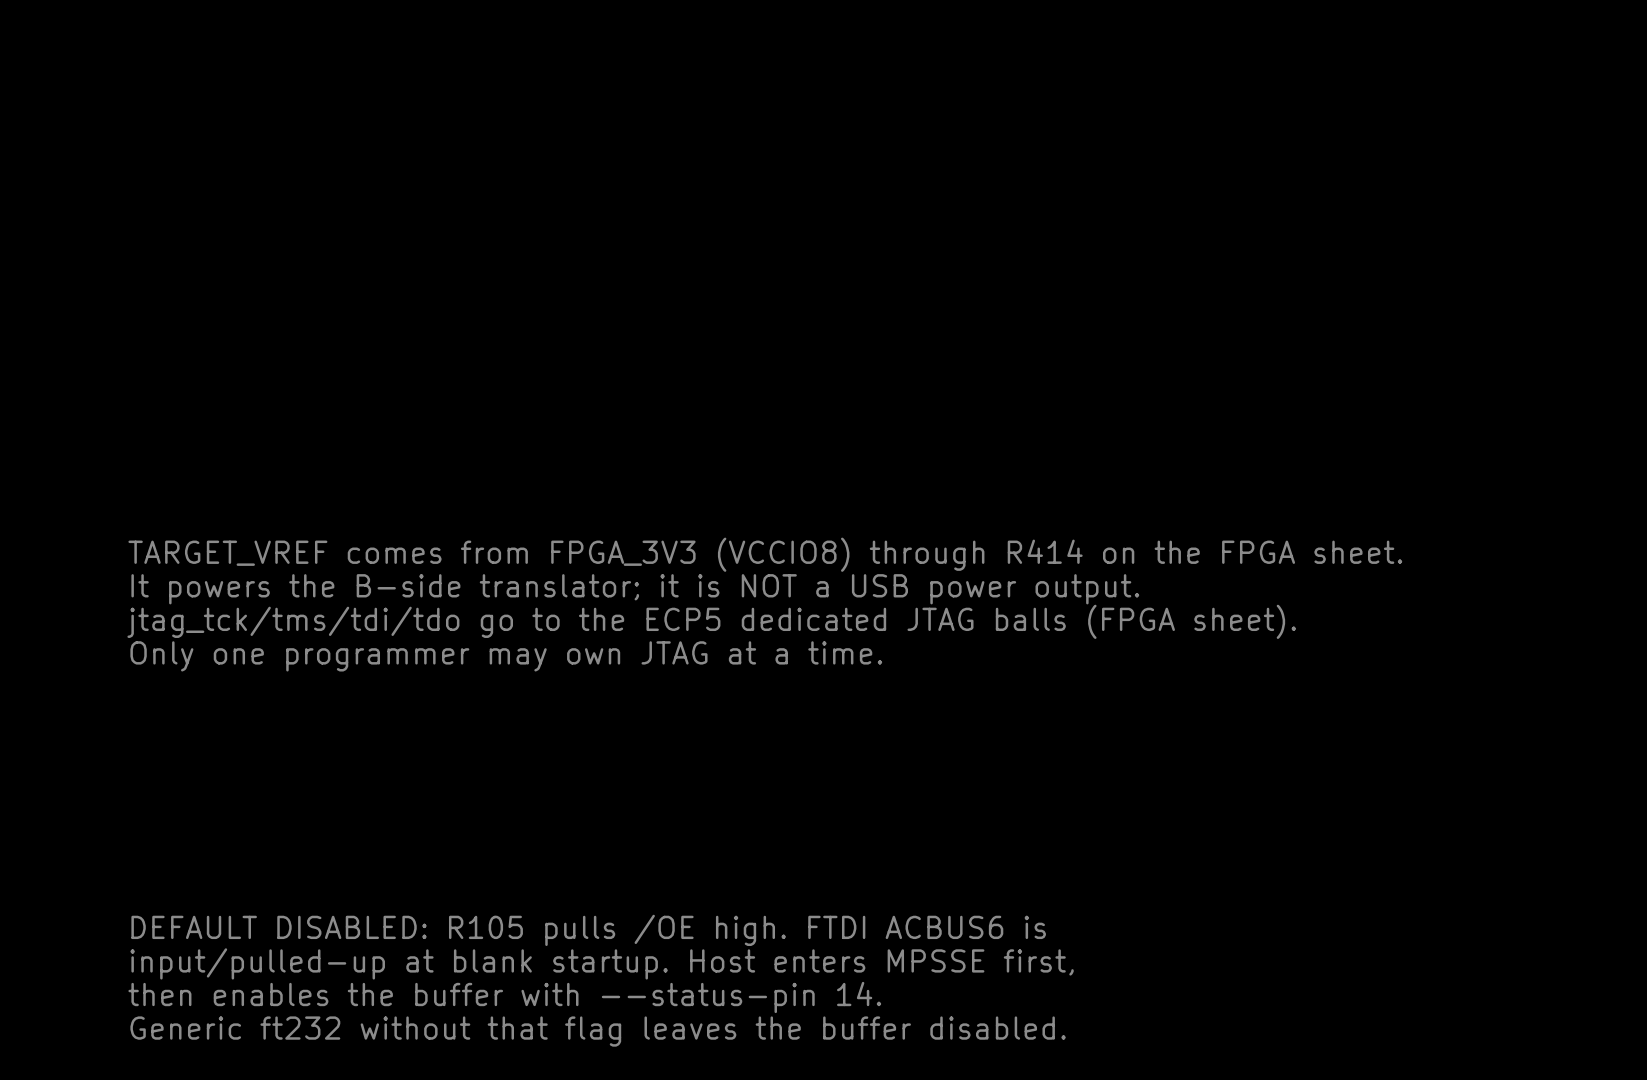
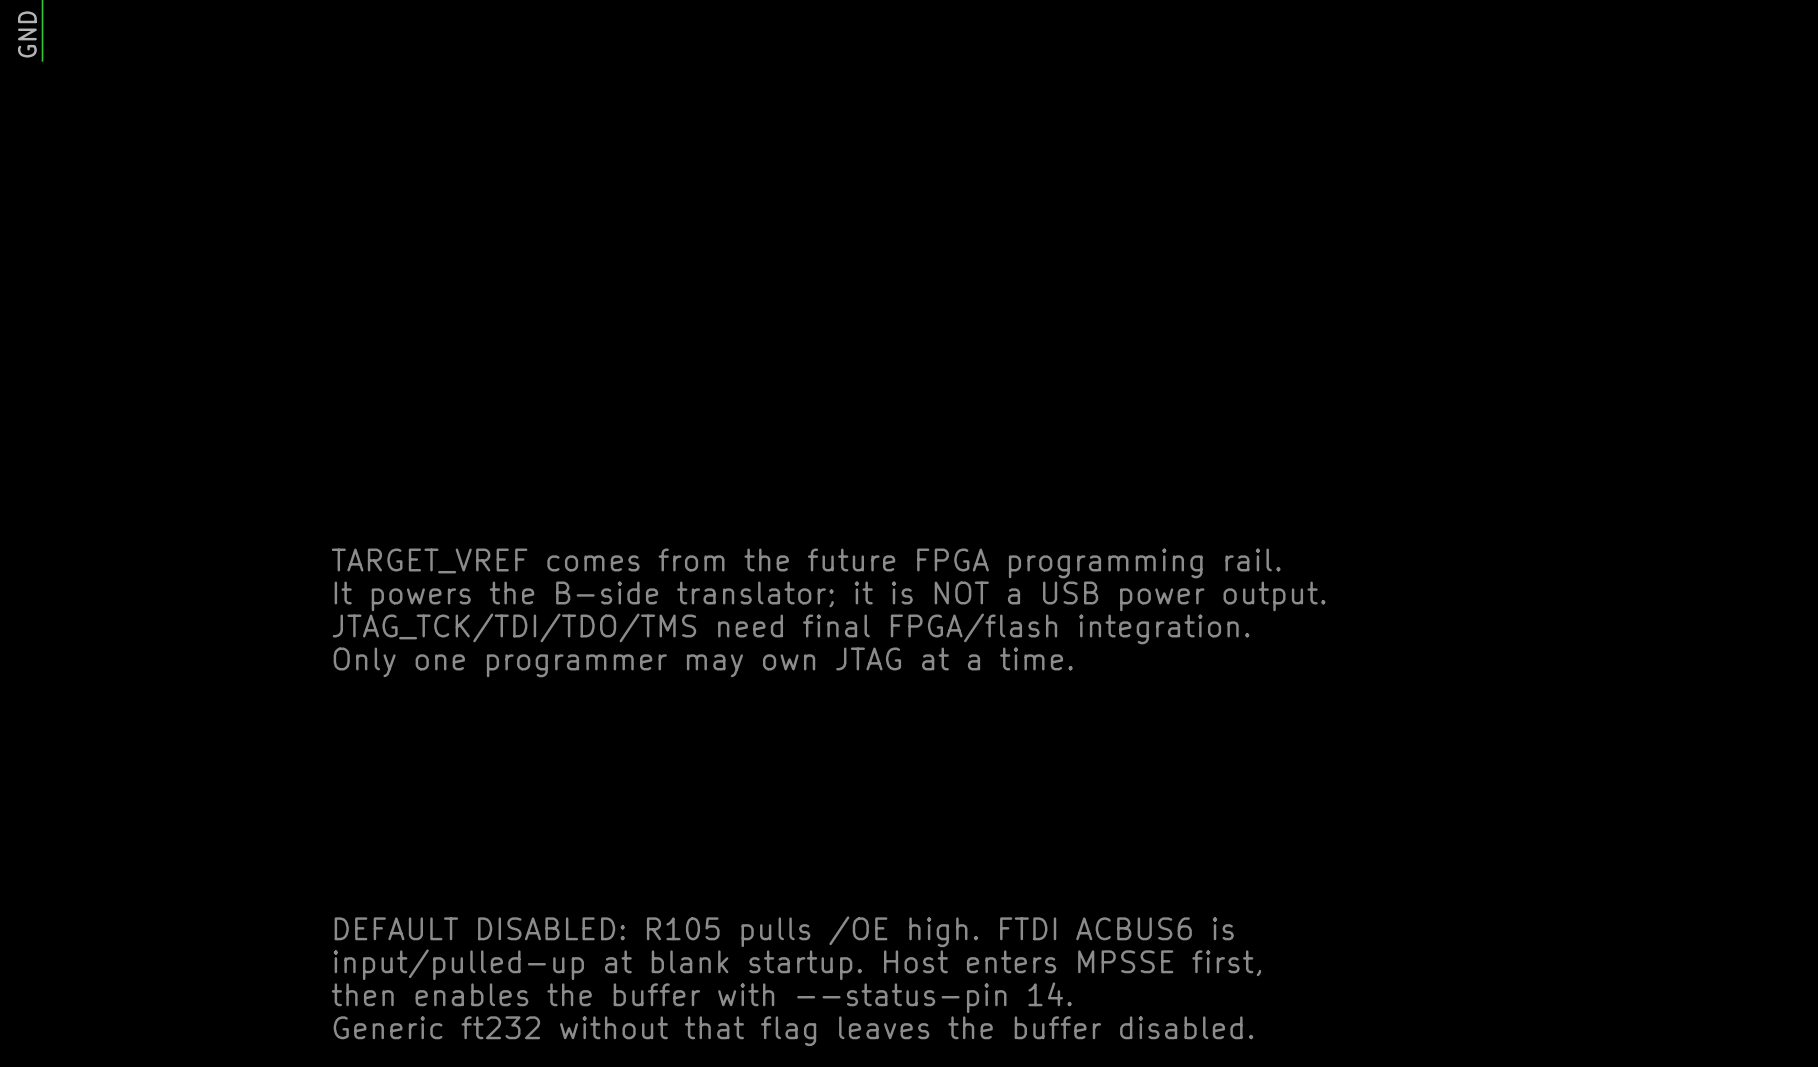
text: TARGET_VREF comes from FPGA_3V3 (VCCIO8) through R414 on the FPGA sheet. (765, 554) -> TARGET_VREF comes from the future FPGA programming rail. (806, 563)
text: jtag_tck/tms/tdi/tdo go to the ECP5 dedicated JTAG balls (FPGA sheet). (711, 621) -> JTAG_TCK/TDI/TDO/TMS need final FPGA/flash integration. (791, 628)

